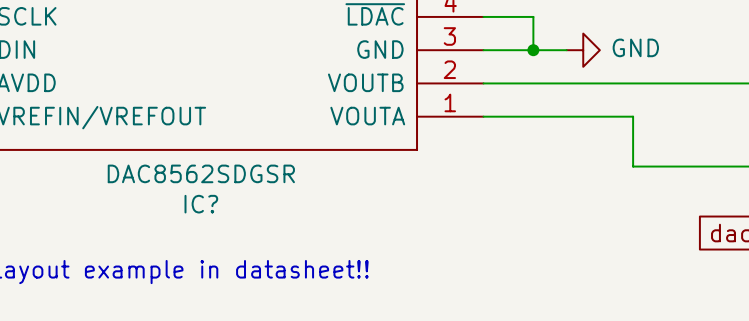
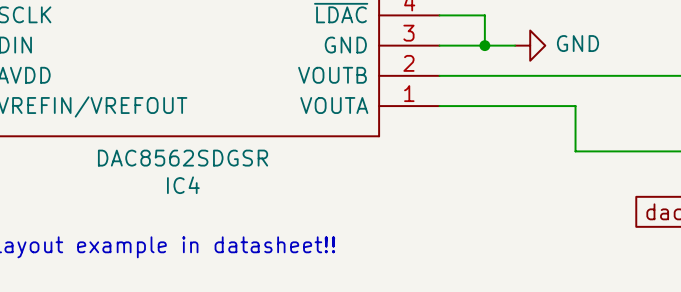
IC? name: IC? (201, 204) -> IC4 (183, 185)

